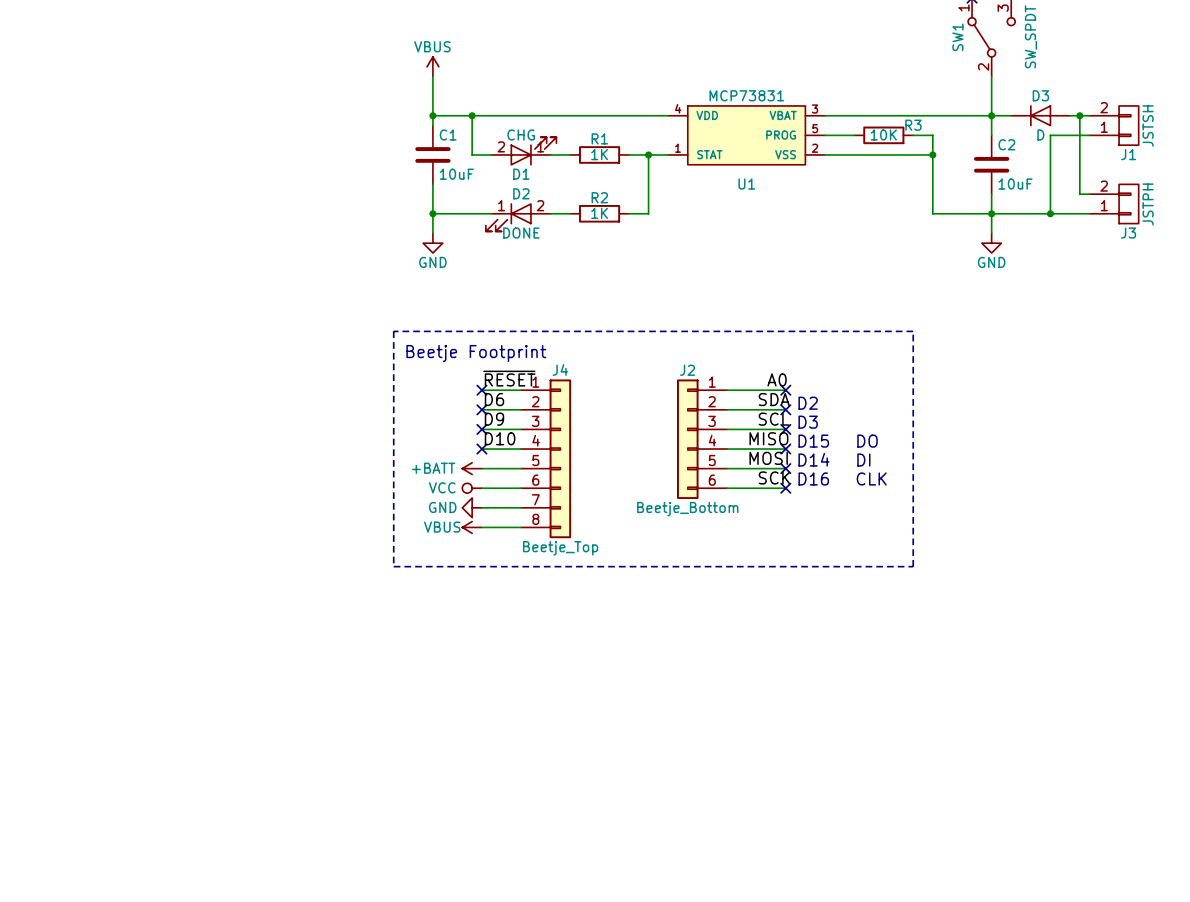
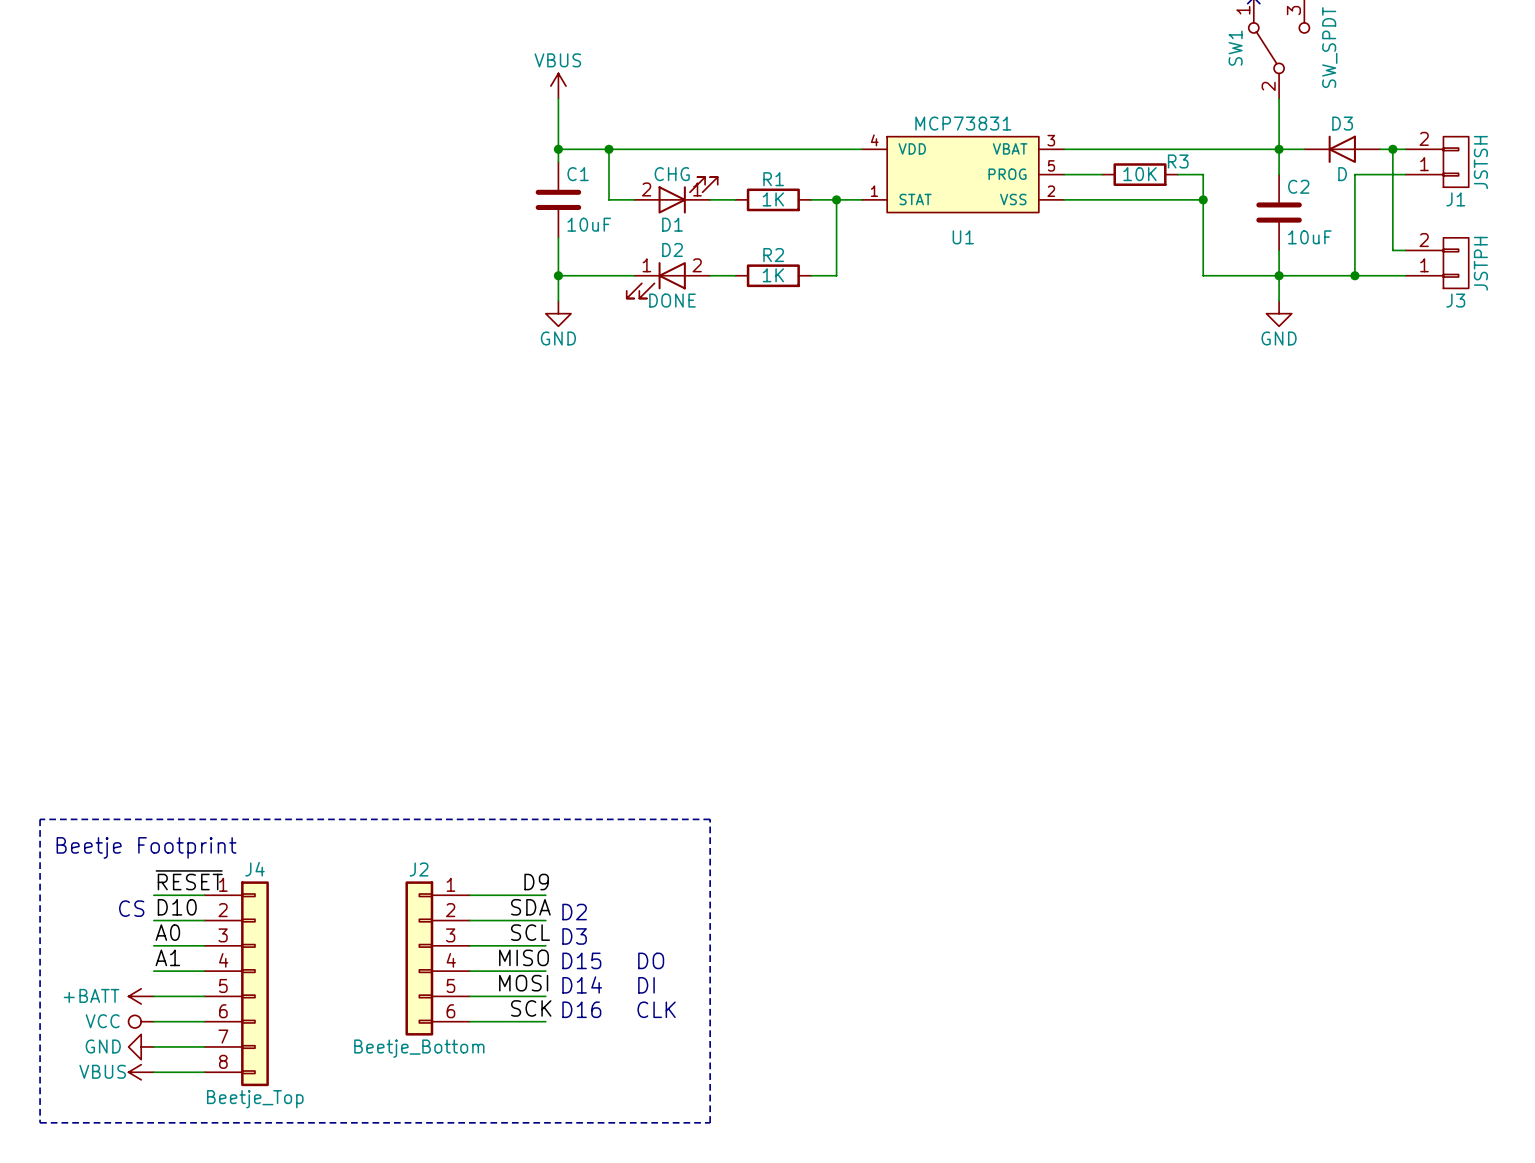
line: (393, 331) (913, 331) (913, 566) (393, 566) (393, 331) -> none
text: Beetje Footprint (476, 353) -> none
label: ~{RESET} (509, 378) -> none
label: A0 (777, 379) -> none
wire: (481, 390) (521, 390) -> none
no-connect mark: (481, 390) -> none
wire: (726, 390) (785, 390) -> none
no-connect mark: (785, 390) -> none
label: D6 (494, 399) -> none
label: SDA (774, 399) -> none
text: D2 (808, 403) -> none
wire: (481, 409) (521, 409) -> none
no-connect mark: (481, 409) -> none
wire: (726, 409) (785, 409) -> none
no-connect mark: (785, 409) -> none
label: D9 (494, 419) -> none
label: SCL (773, 419) -> none
text: D3 (808, 422) -> none
wire: (481, 429) (521, 429) -> none
no-connect mark: (481, 429) -> none
wire: (726, 429) (785, 429) -> none
no-connect mark: (785, 429) -> none
label: D10 (500, 438) -> none
label: MISO (768, 438) -> none
J2 position: (701, 439) -> (437, 958)
text: D15 (813, 441) -> none
text: DO (867, 441) -> none
wire: (481, 449) (521, 449) -> none
no-connect mark: (481, 449) -> none
wire: (726, 449) (785, 449) -> none
no-connect mark: (785, 449) -> none
J4 position: (546, 458) -> (236, 983)
label: MOSI (768, 458) -> none
text: D14 (814, 459) -> none
text: DI (863, 460) -> none
power symbol: +BATT (472, 468) -> none
wire: (481, 468) (521, 468) -> none
wire: (726, 468) (785, 468) -> none
no-connect mark: (785, 468) -> none
label: SCK (774, 477) -> none
text: D16 (813, 478) -> none
text: CLK (871, 478) -> none
power symbol: VCC (472, 488) -> none
wire: (481, 488) (521, 488) -> none
wire: (726, 488) (785, 488) -> none
no-connect mark: (785, 488) -> none
power symbol: GND (472, 507) -> none
wire: (481, 507) (521, 507) -> none
power symbol: VBUS (472, 527) -> none
wire: (481, 527) (521, 527) -> none
line: none -> (40, 819) (710, 819) (710, 1122) (40, 1122) (40, 819)
text: none -> Beetje Footprint (146, 847)
label: none -> ~{RESET} (189, 880)
label: none -> D9 (536, 882)
wire: none -> (153, 895) (204, 895)
wire: none -> (469, 895) (545, 895)
label: none -> D10 (177, 907)
label: none -> SDA (530, 907)
text: none -> CS (131, 908)
text: none -> D2 (574, 912)
wire: none -> (153, 920) (204, 920)
wire: none -> (469, 920) (545, 920)
label: none -> A0 (167, 932)
label: none -> SCL (530, 932)
text: none -> D3 (574, 936)
wire: none -> (153, 945) (204, 945)
wire: none -> (469, 945) (545, 945)
label: none -> A1 (167, 957)
label: none -> MISO (524, 957)
text: none -> D15 (581, 960)
text: none -> DO (651, 960)
wire: none -> (153, 971) (204, 971)
wire: none -> (469, 971) (545, 971)
label: none -> MOSI (523, 983)
text: none -> D14 (582, 984)
text: none -> DI (646, 985)
power symbol: none -> +BATT (141, 996)
wire: none -> (153, 996) (204, 996)
wire: none -> (469, 996) (545, 996)
label: none -> SCK (531, 1008)
text: none -> D16 (581, 1009)
text: none -> CLK (656, 1009)
power symbol: none -> VCC (141, 1021)
wire: none -> (153, 1021) (204, 1021)
wire: none -> (469, 1021) (545, 1021)
power symbol: none -> GND (141, 1046)
wire: none -> (153, 1046) (204, 1046)
power symbol: none -> VBUS (141, 1072)
wire: none -> (153, 1072) (204, 1072)

